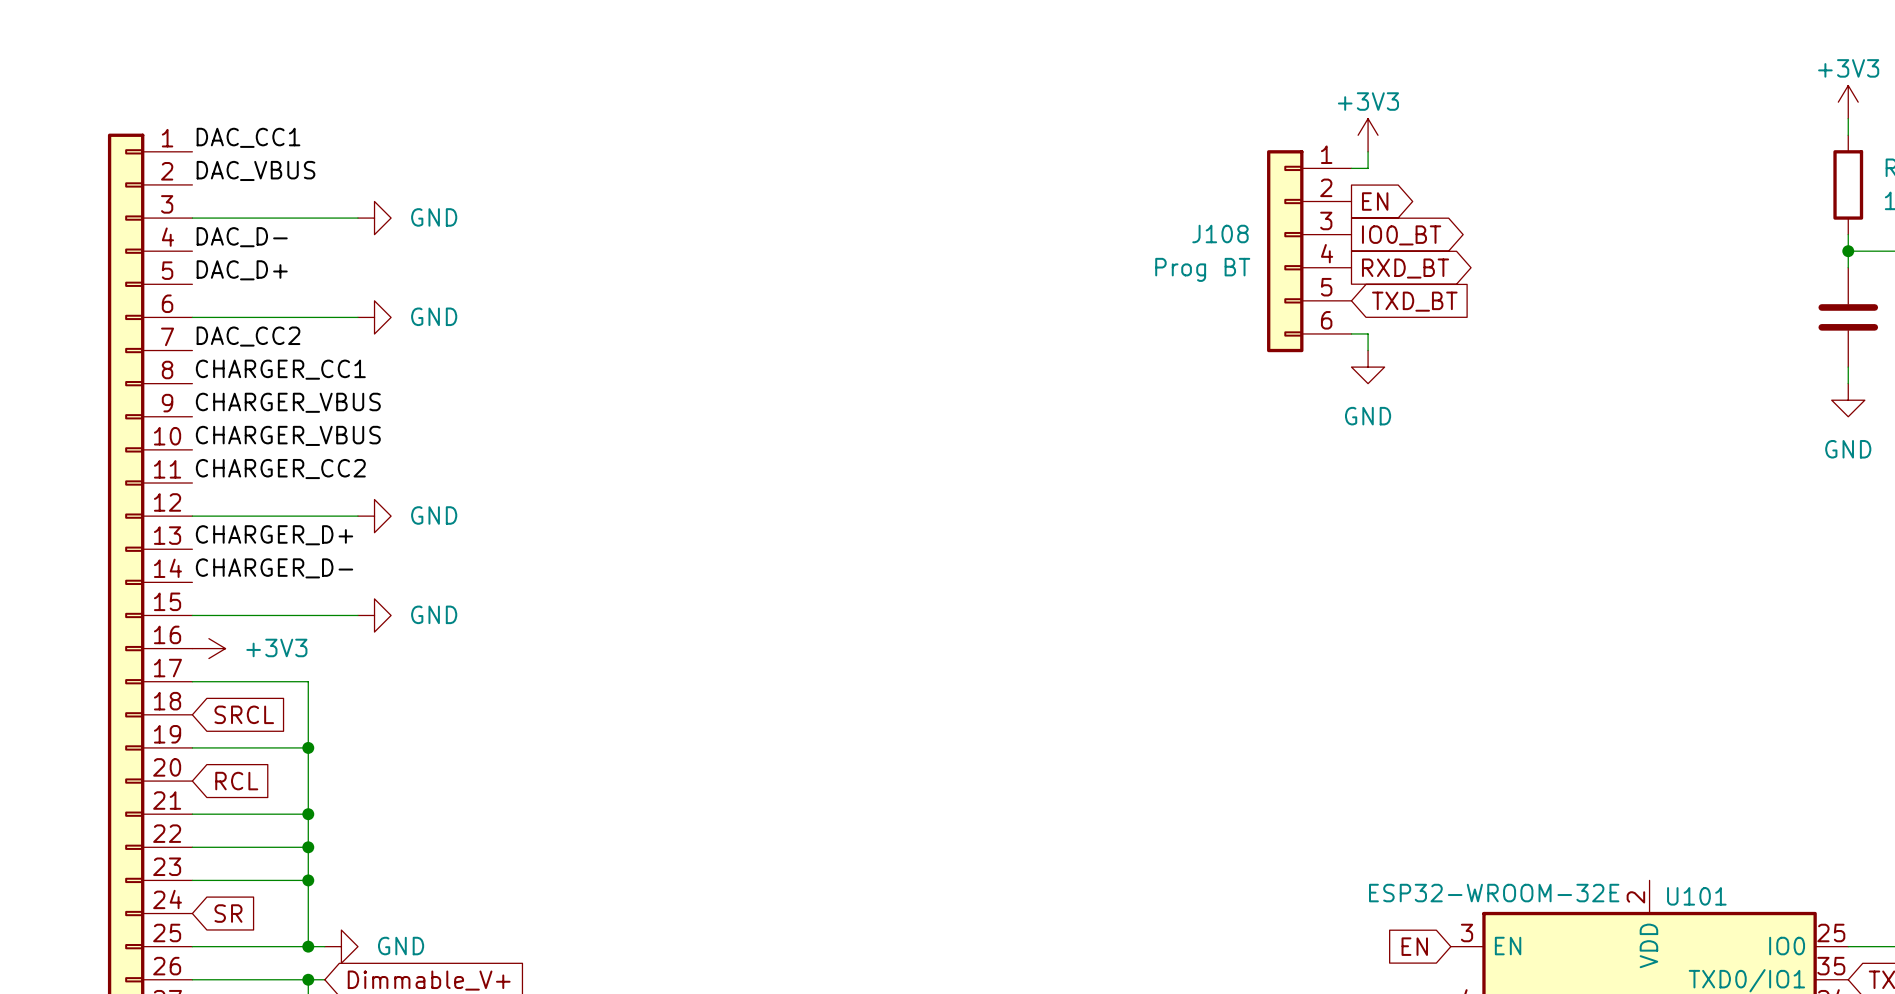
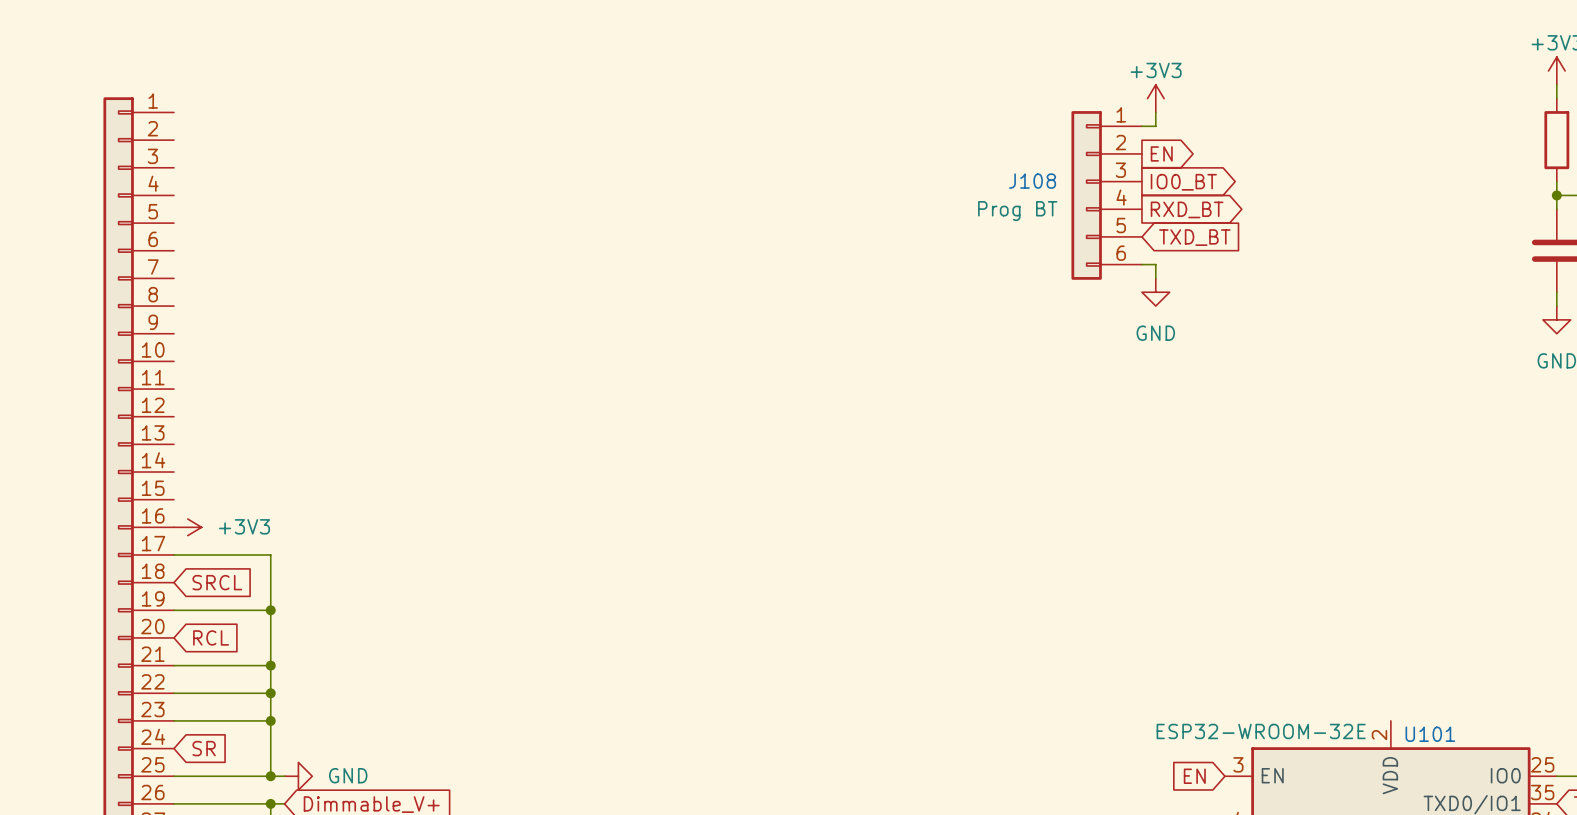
label: DAC_CC1 (248, 137) -> none
label: DAC_VBUS (255, 170) -> none
wire: (192, 218) (357, 218) -> none
power symbol: GND (374, 218) -> none
label: DAC_D- (242, 237) -> none
label: DAC_D+ (242, 270) -> none
wire: (192, 317) (357, 317) -> none
power symbol: GND (374, 317) -> none
label: DAC_CC2 (248, 336) -> none
label: CHARGER_CC1 (280, 369) -> none
label: CHARGER_VBUS (288, 402) -> none
label: CHARGER_VBUS (288, 435) -> none
label: CHARGER_CC2 (280, 469) -> none
wire: (192, 516) (357, 516) -> none
power symbol: GND (374, 516) -> none
label: CHARGER_D+ (274, 535) -> none
label: CHARGER_D- (274, 568) -> none
wire: (192, 615) (357, 615) -> none
power symbol: GND (374, 615) -> none

